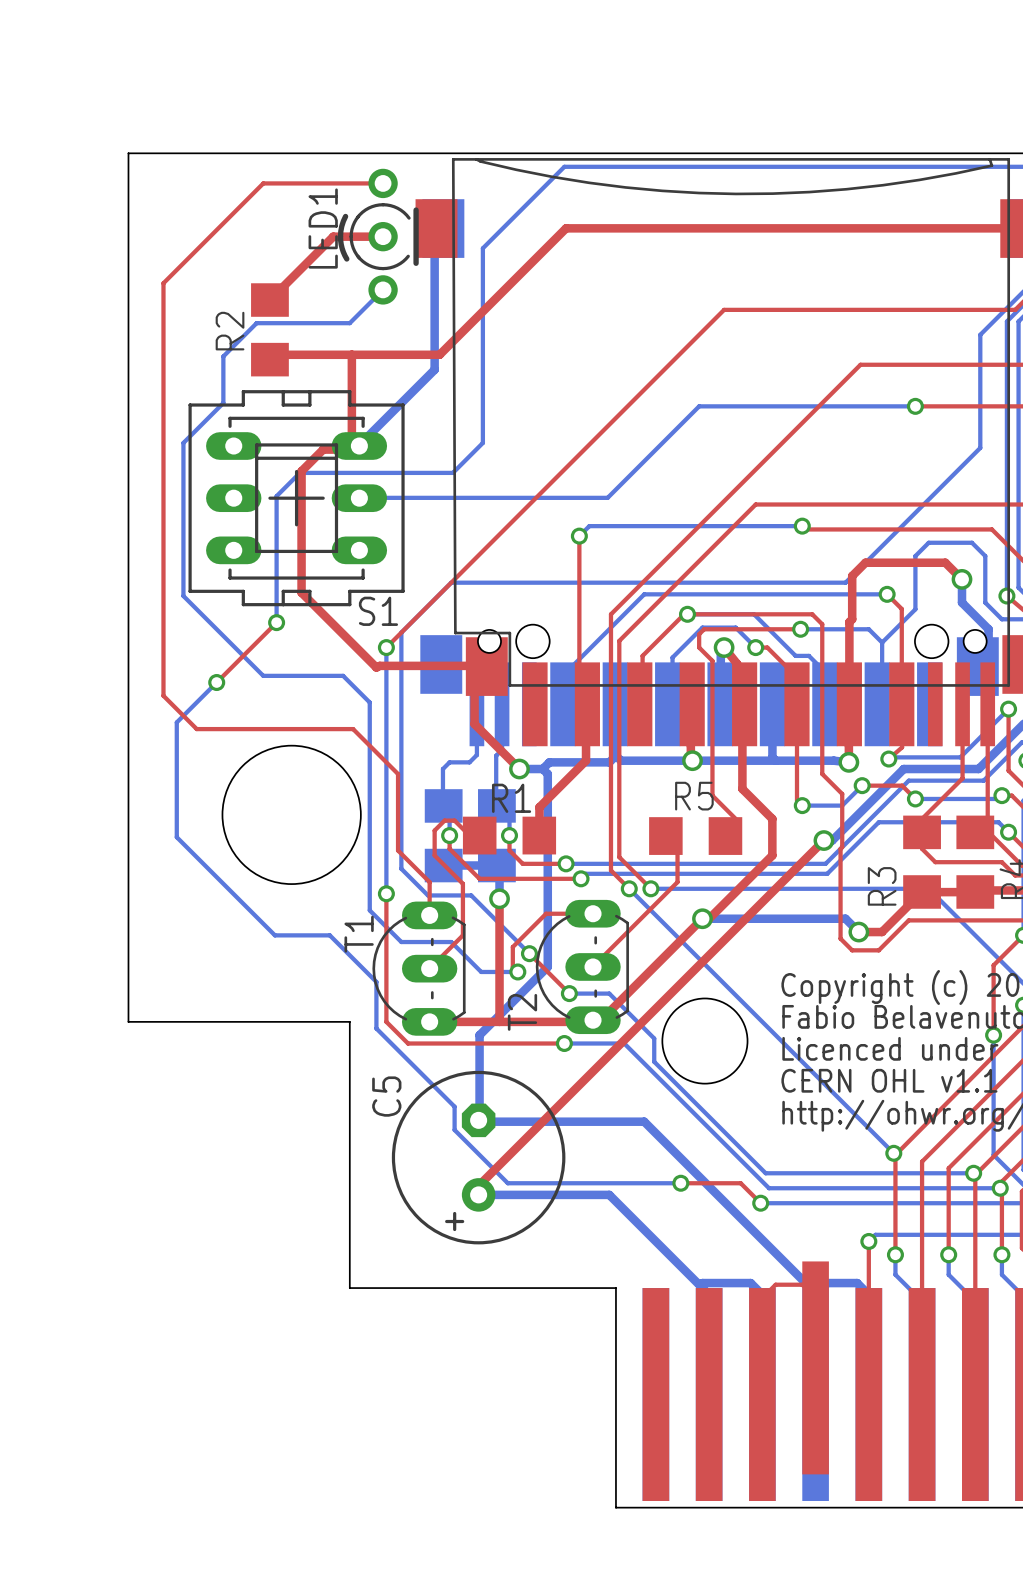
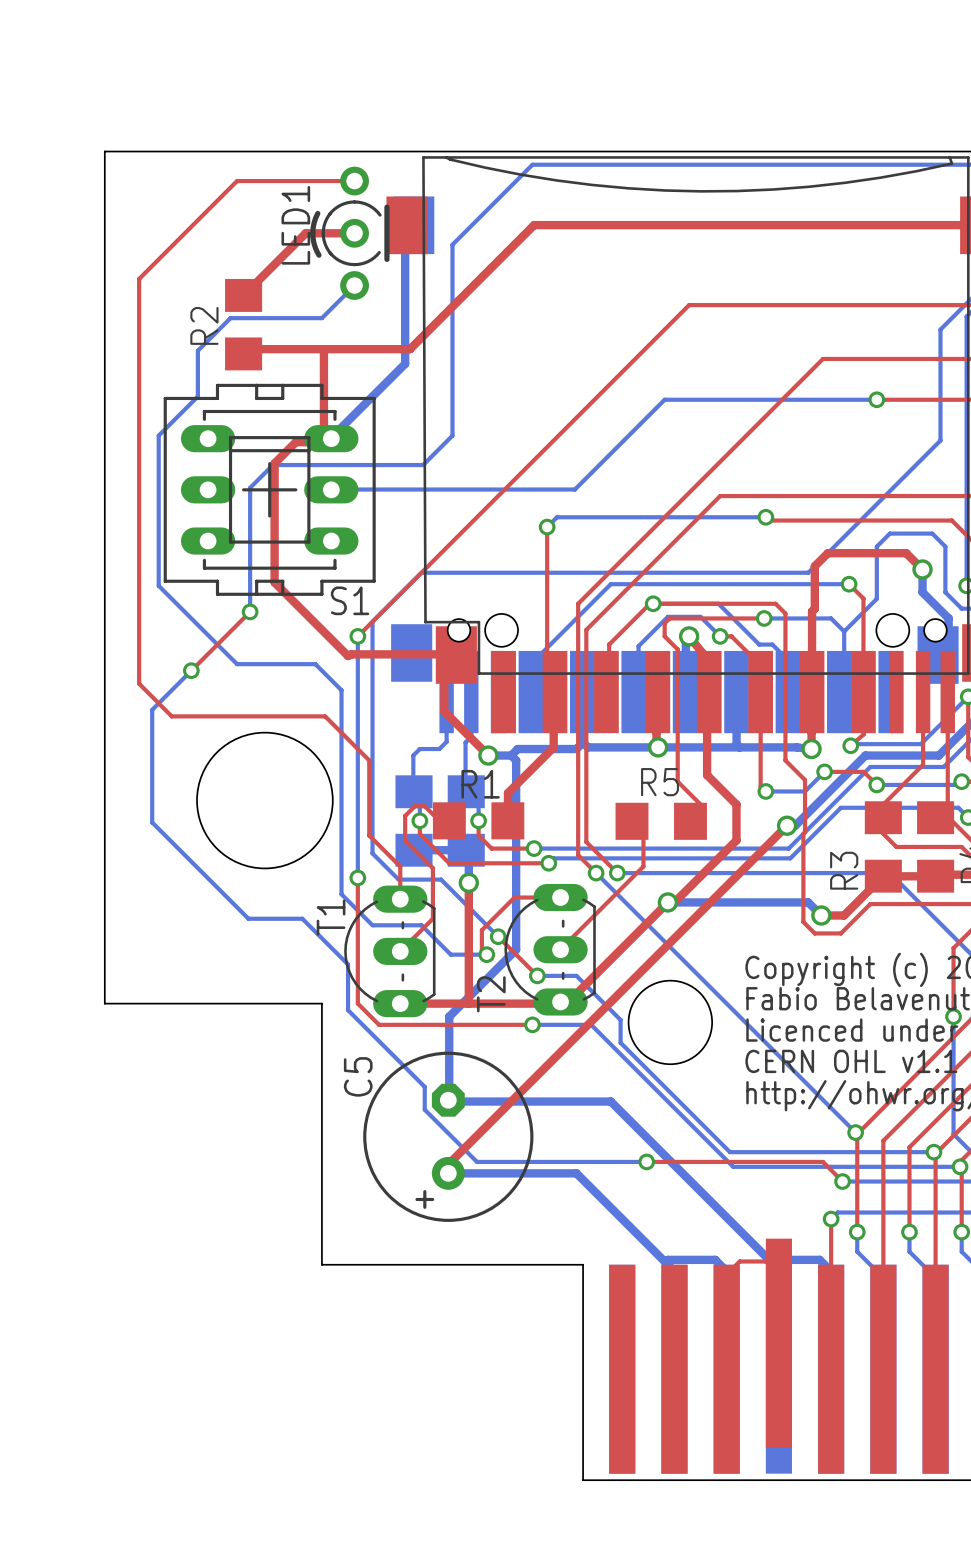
top track: (740, 1183) (760, 1203) -> (705, 1161) (822, 1161) (842, 1181)
bottom track: (760, 1203) (880, 1203) -> none
via position: (760, 1203) -> (842, 1181)

